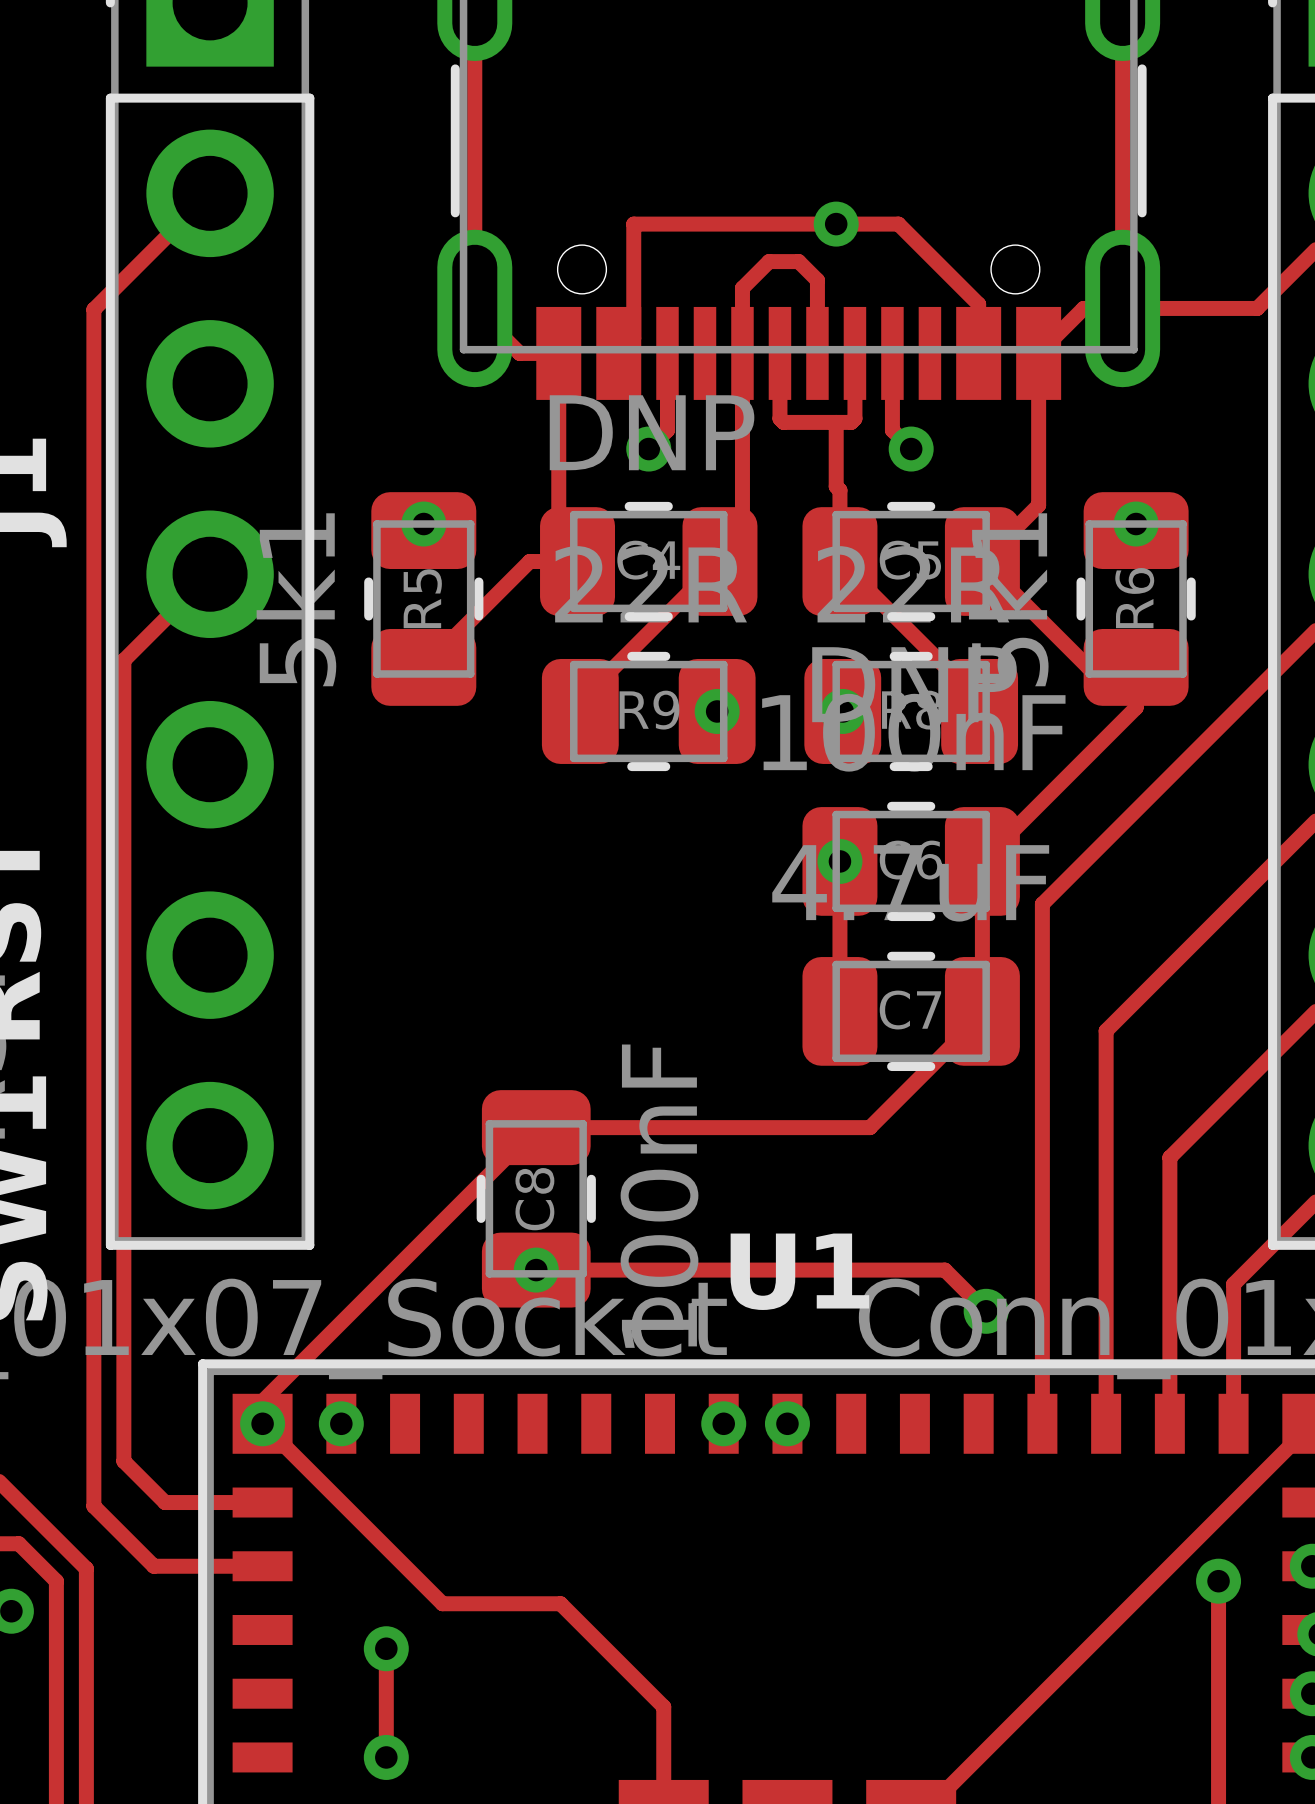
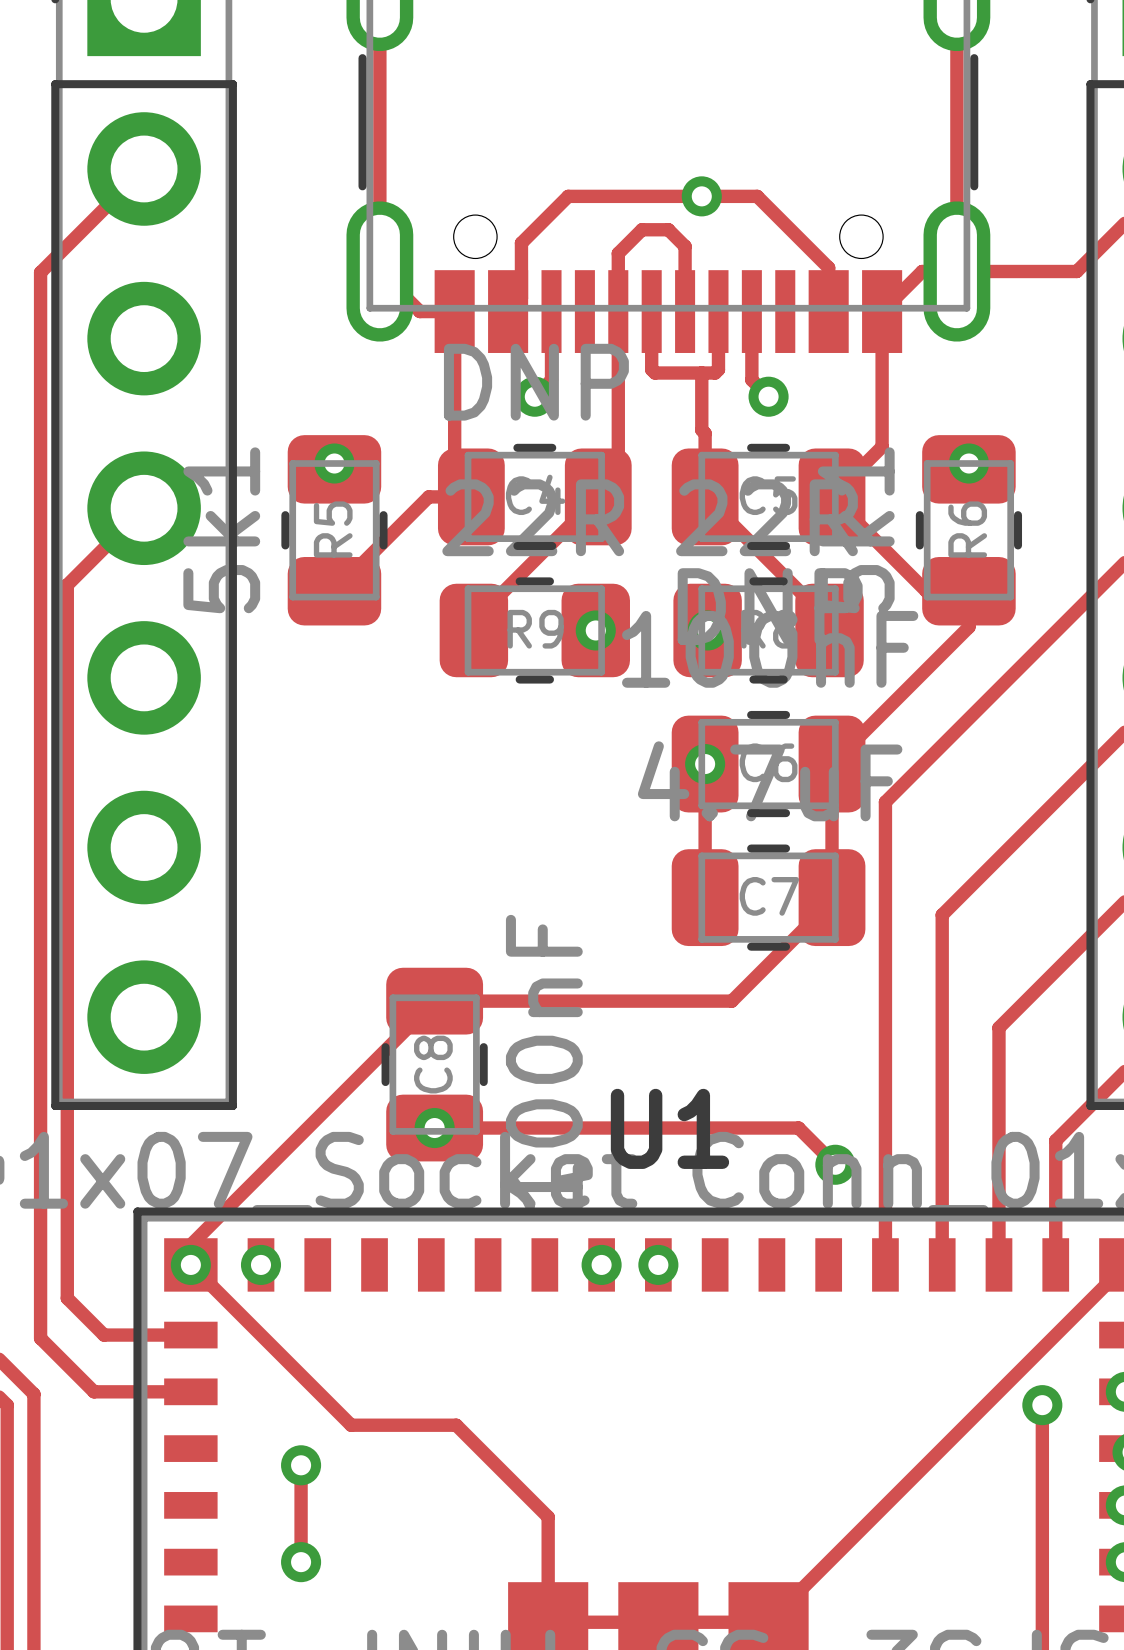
track: (686, 224) (633, 224) (633, 276) -> (568, 196) (521, 243)

